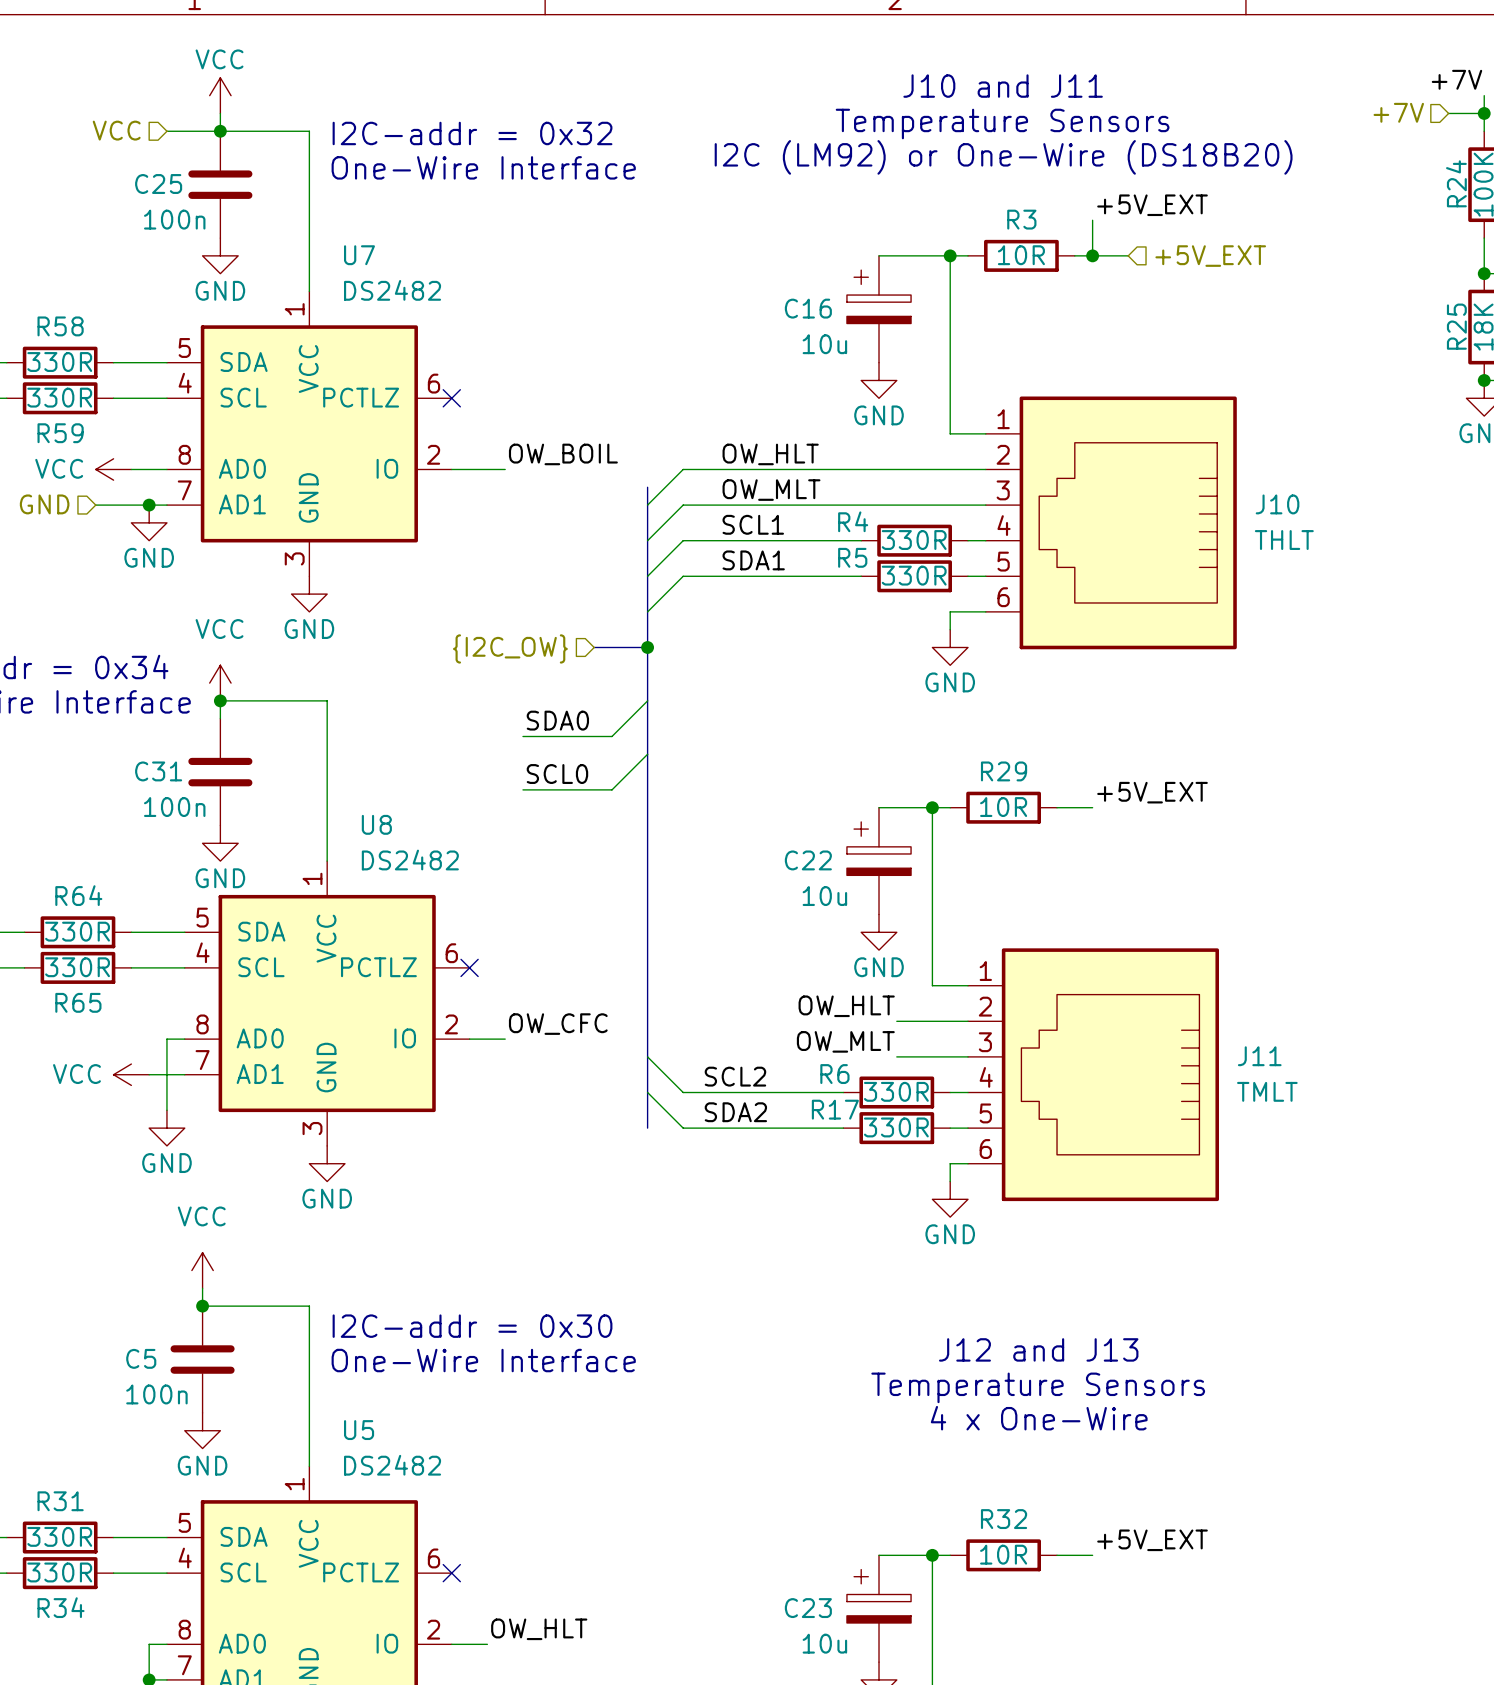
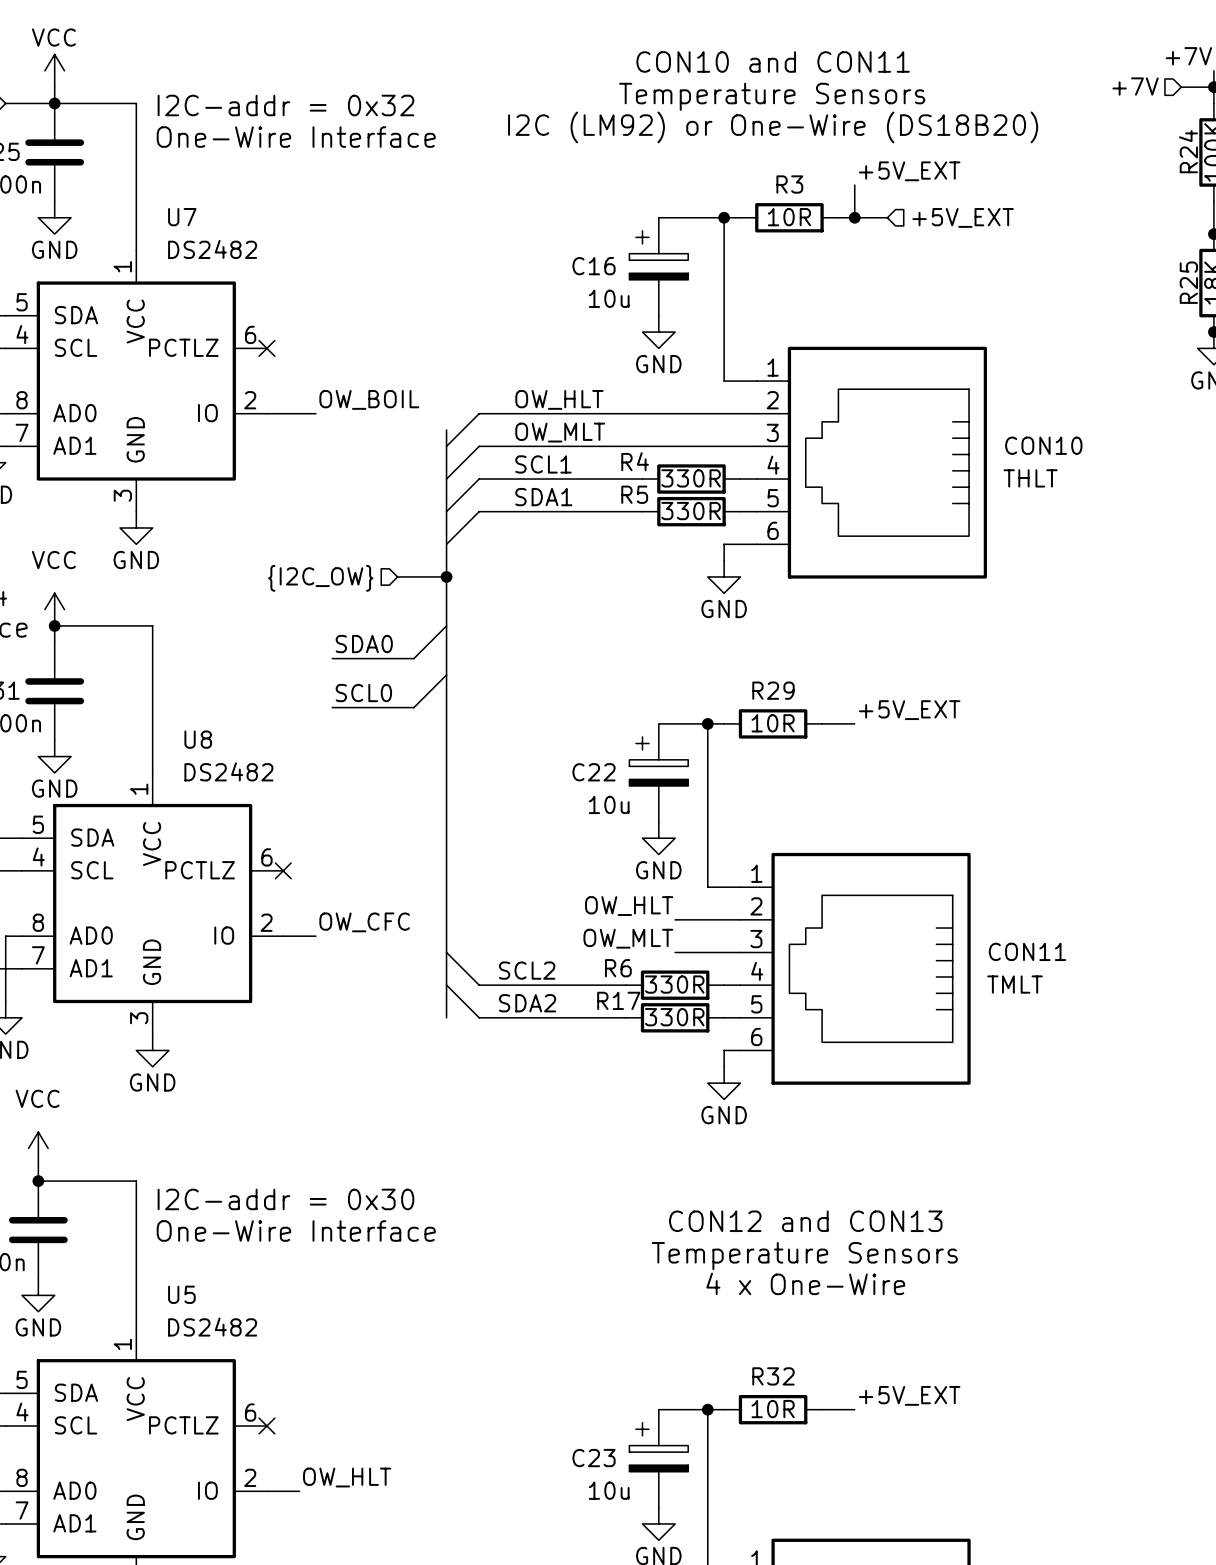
text: J10 and J11 (1003, 86) -> CON10 and CON11 (773, 62)
J10 name: J10 (1277, 504) -> CON10 (1043, 445)
J11 name: J11 (1259, 1056) -> CON11 (1027, 951)
text: J12 and J13 (1038, 1349) -> CON12 and CON13 (805, 1221)

